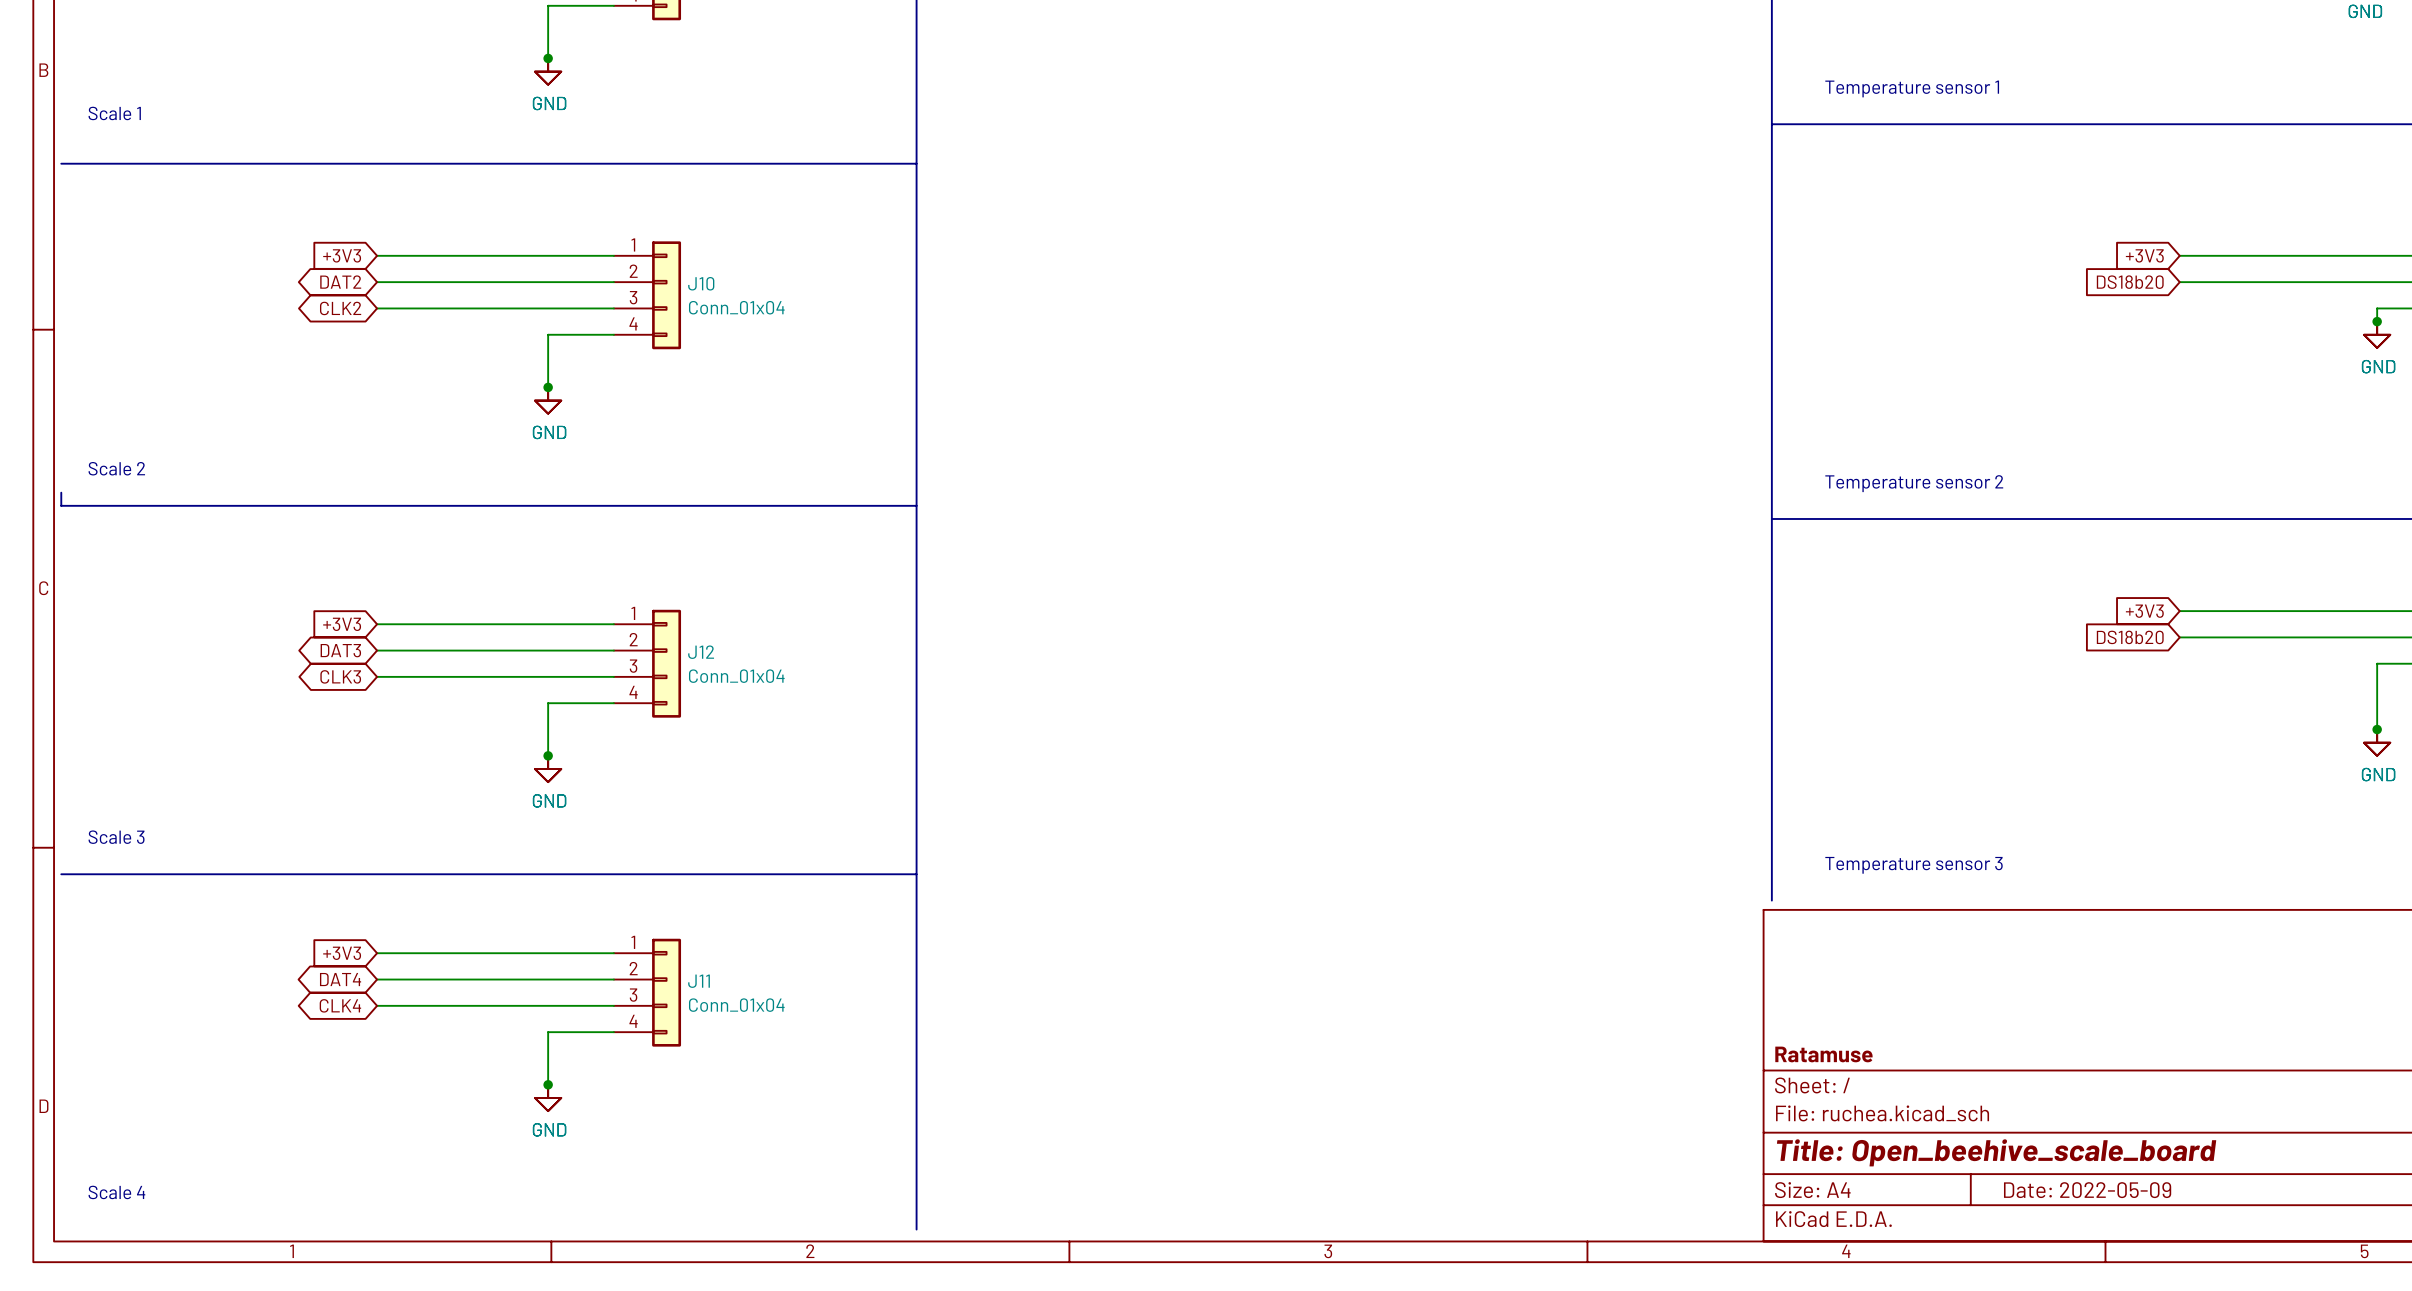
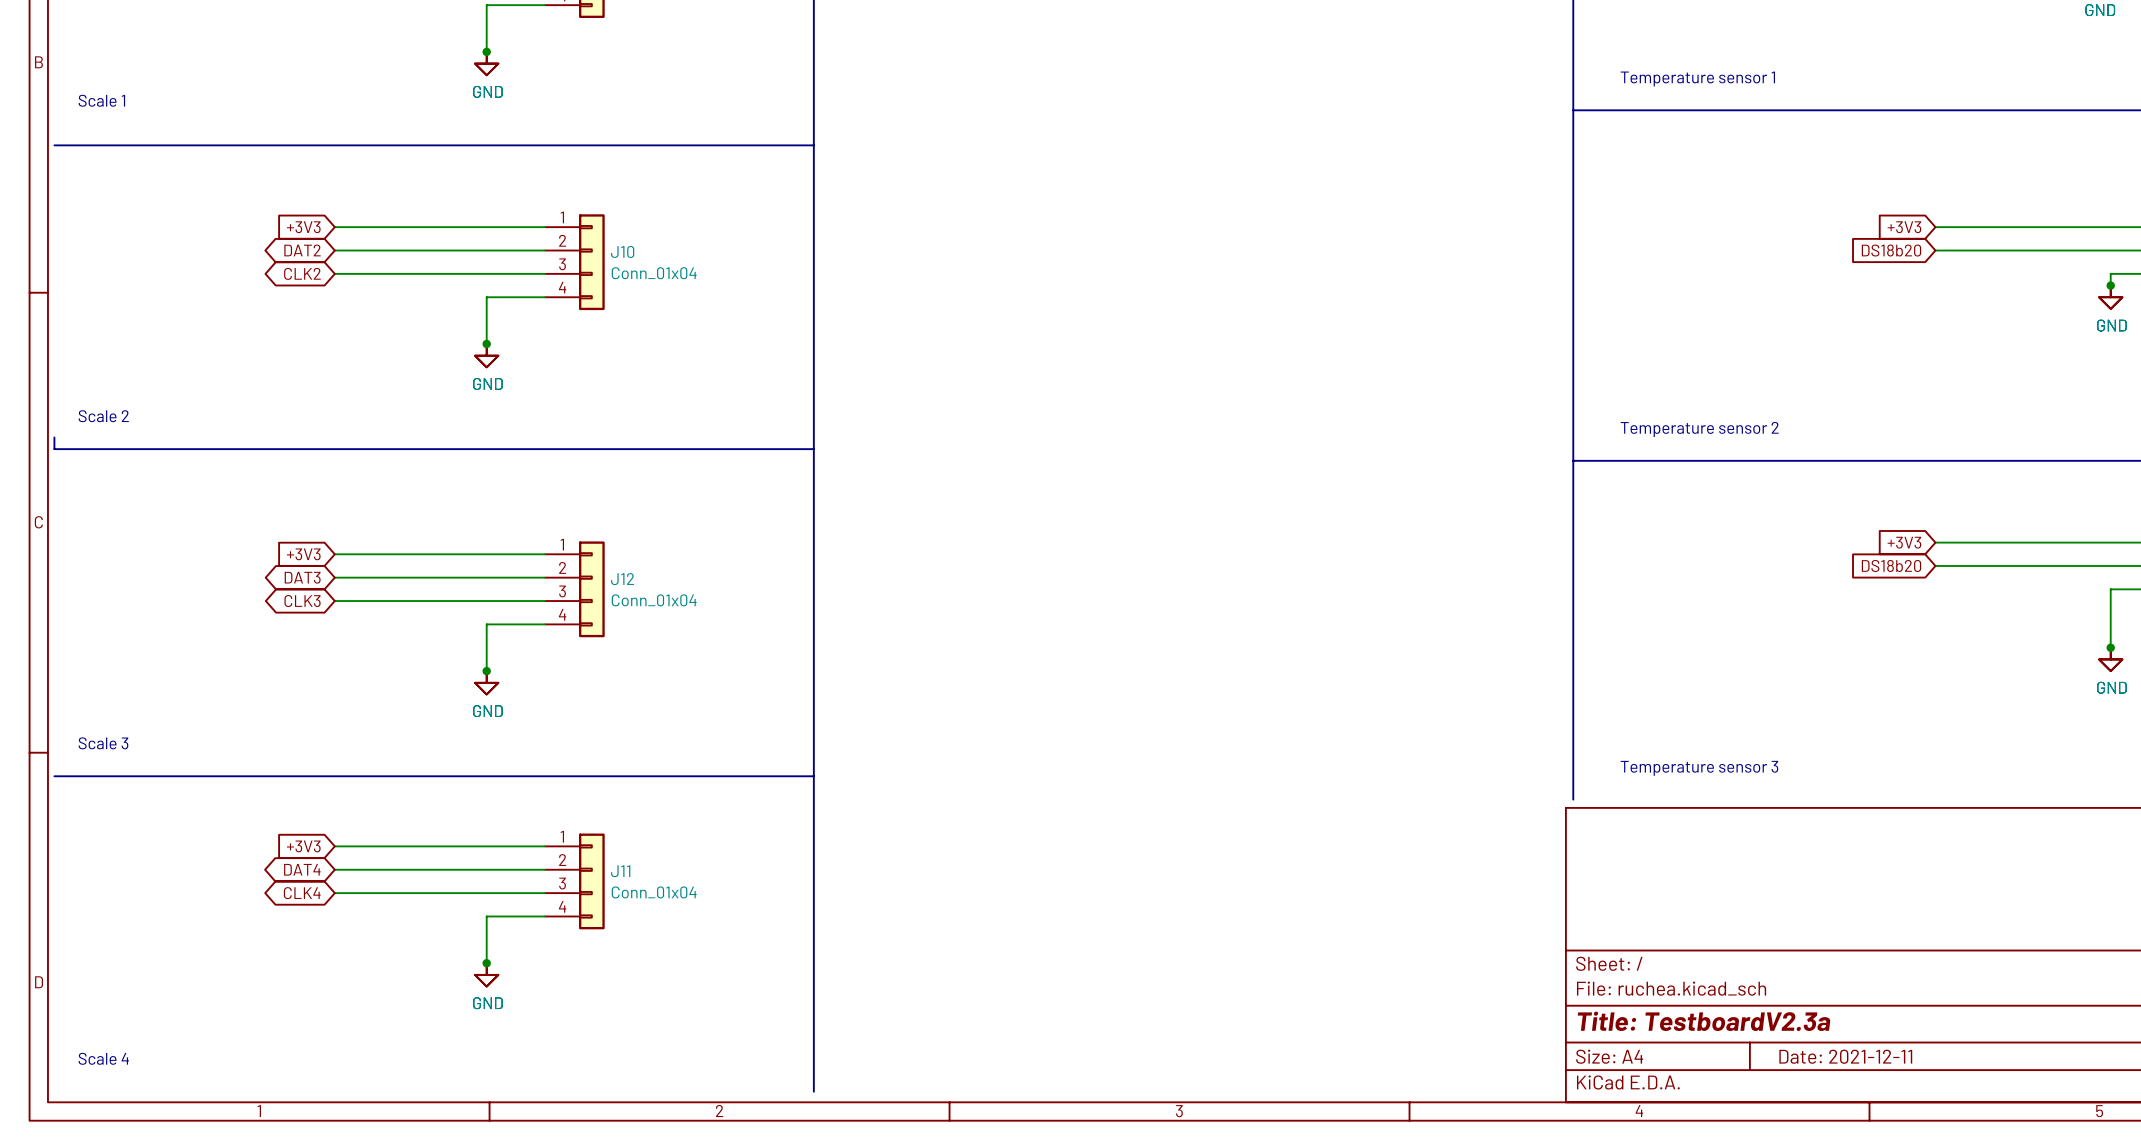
title block: Ratamuse (1823, 1054) -> none
title block: Title: Open_beehive_scale_board (1996, 1152) -> Title: TestboardV2.3a (1704, 1021)
title block: Date: 2022-05-09 (2087, 1190) -> Date: 2021-12-11 (1845, 1056)

